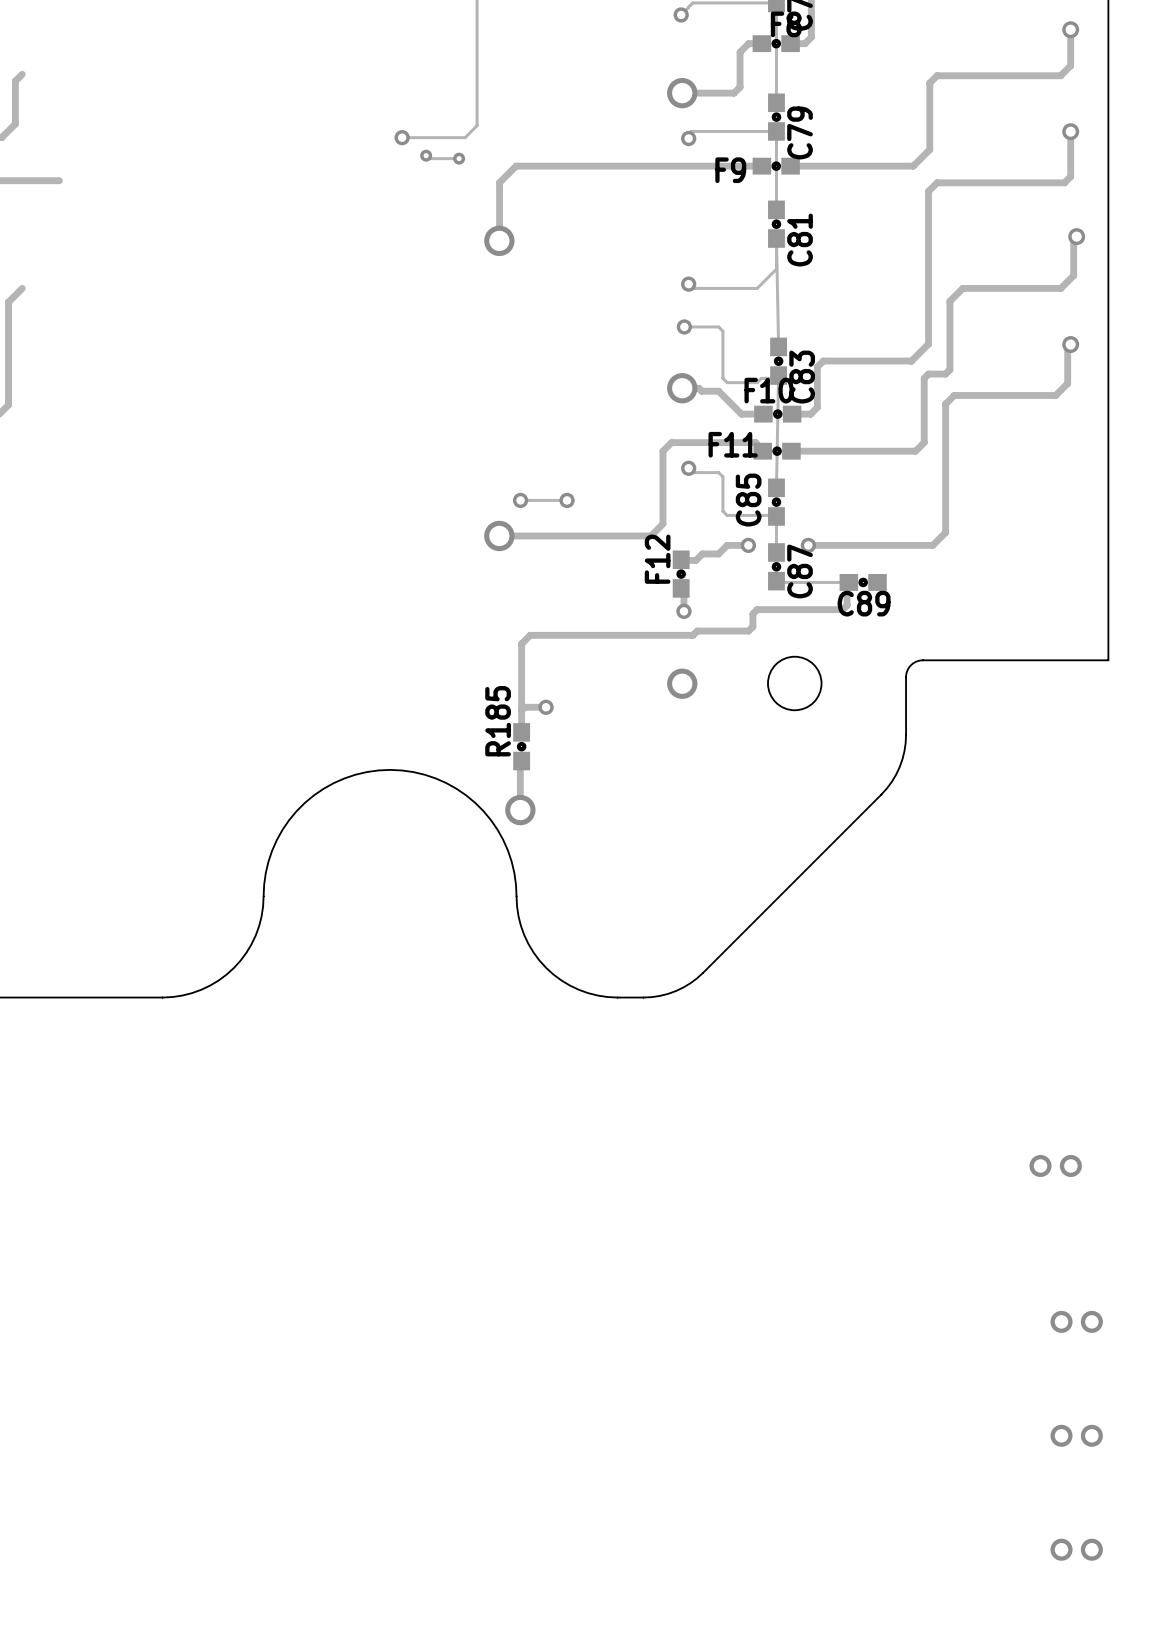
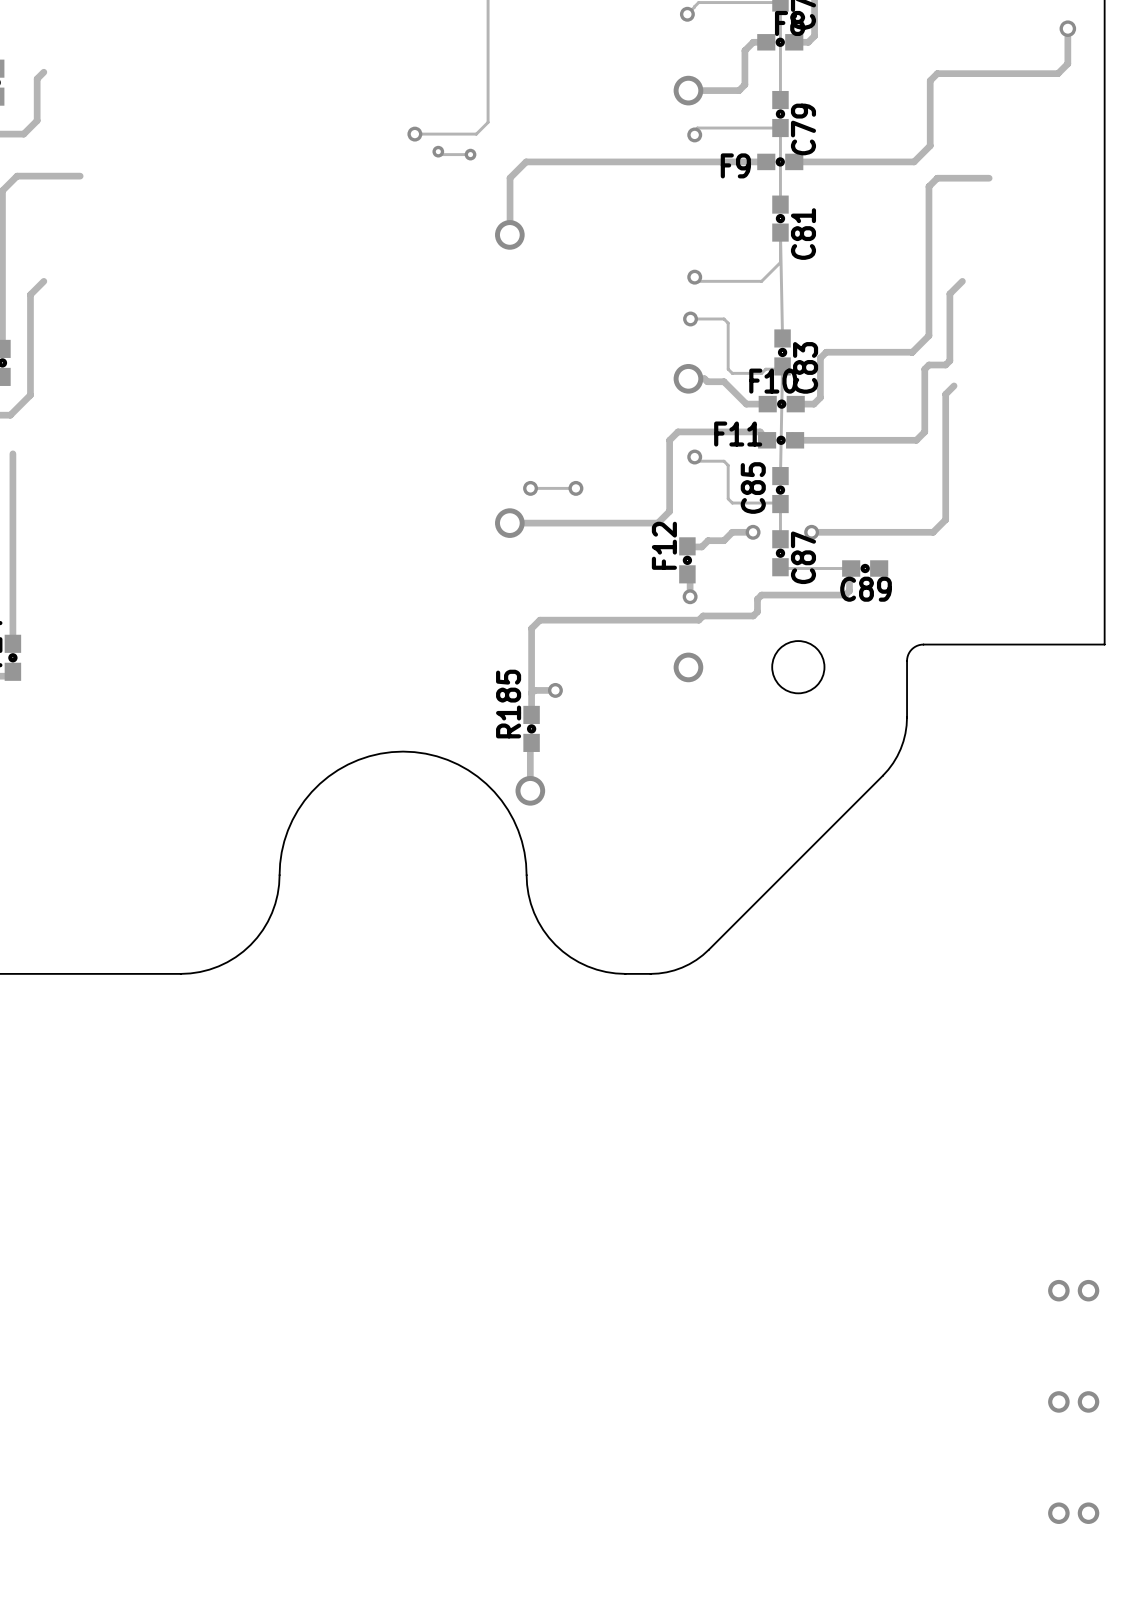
track: (1070, 131) (1070, 176) (1064, 182) (990, 182) -> none
via: (1070, 131) -> none
track: (1076, 236) (1073, 239) (1073, 275) (1060, 288) (962, 288) -> none
via: (1076, 236) -> none
track: (1070, 344) (1067, 347) (1067, 383) (1055, 395) (954, 395) -> none
via: (1070, 344) -> none
part: (1055, 1165) -> none

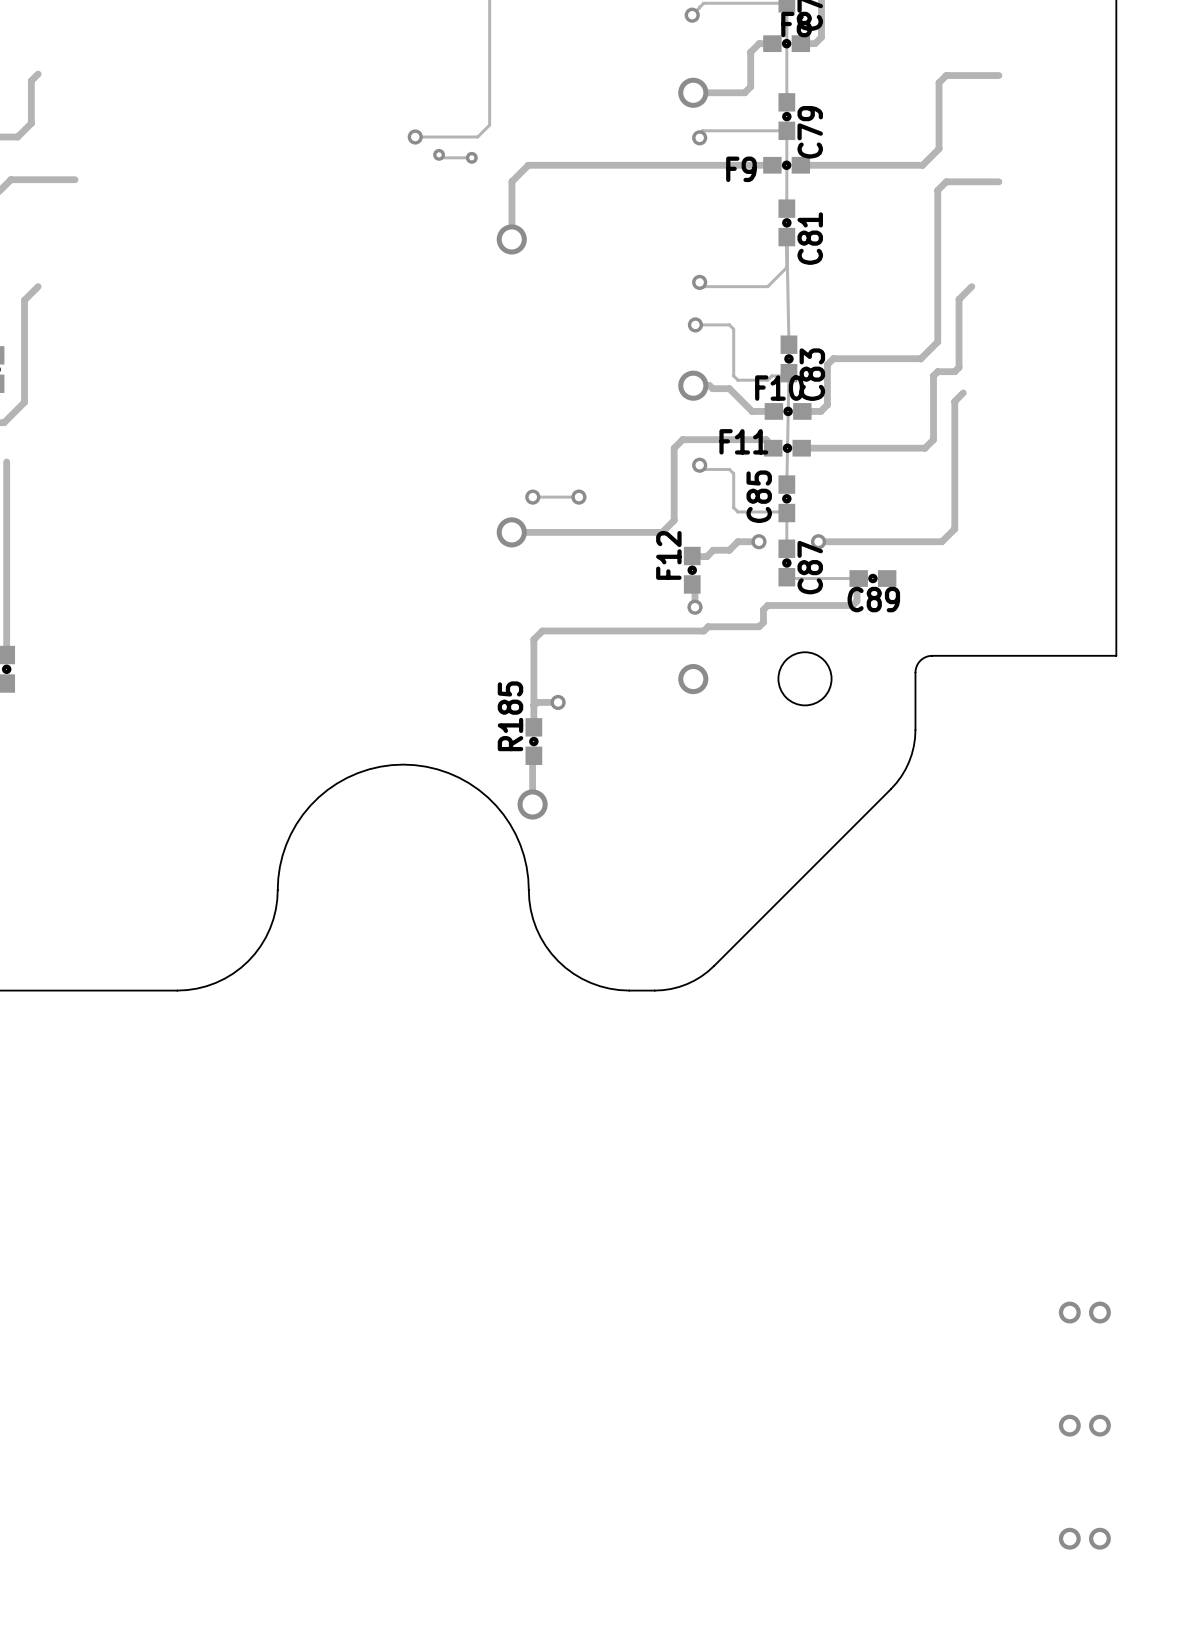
track: (1067, 28) (1067, 63) (1058, 73) (989, 73) -> none
via: (1067, 28) -> none

